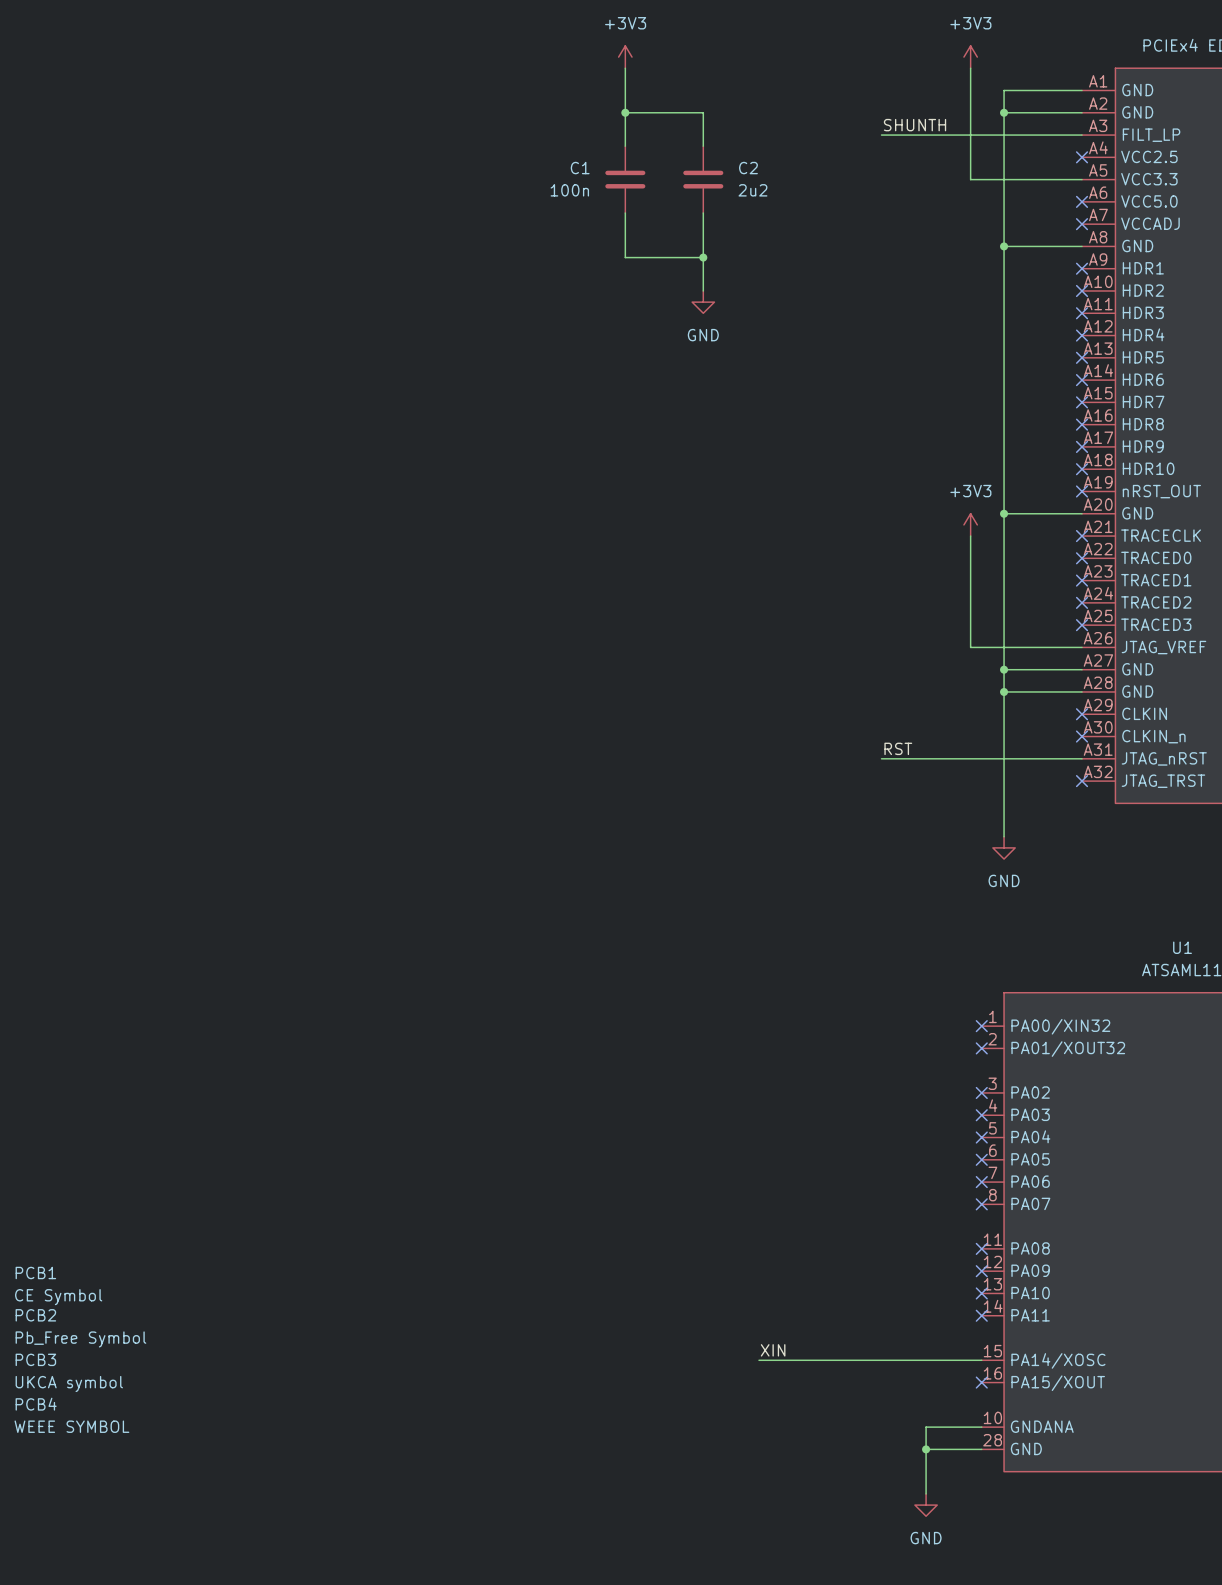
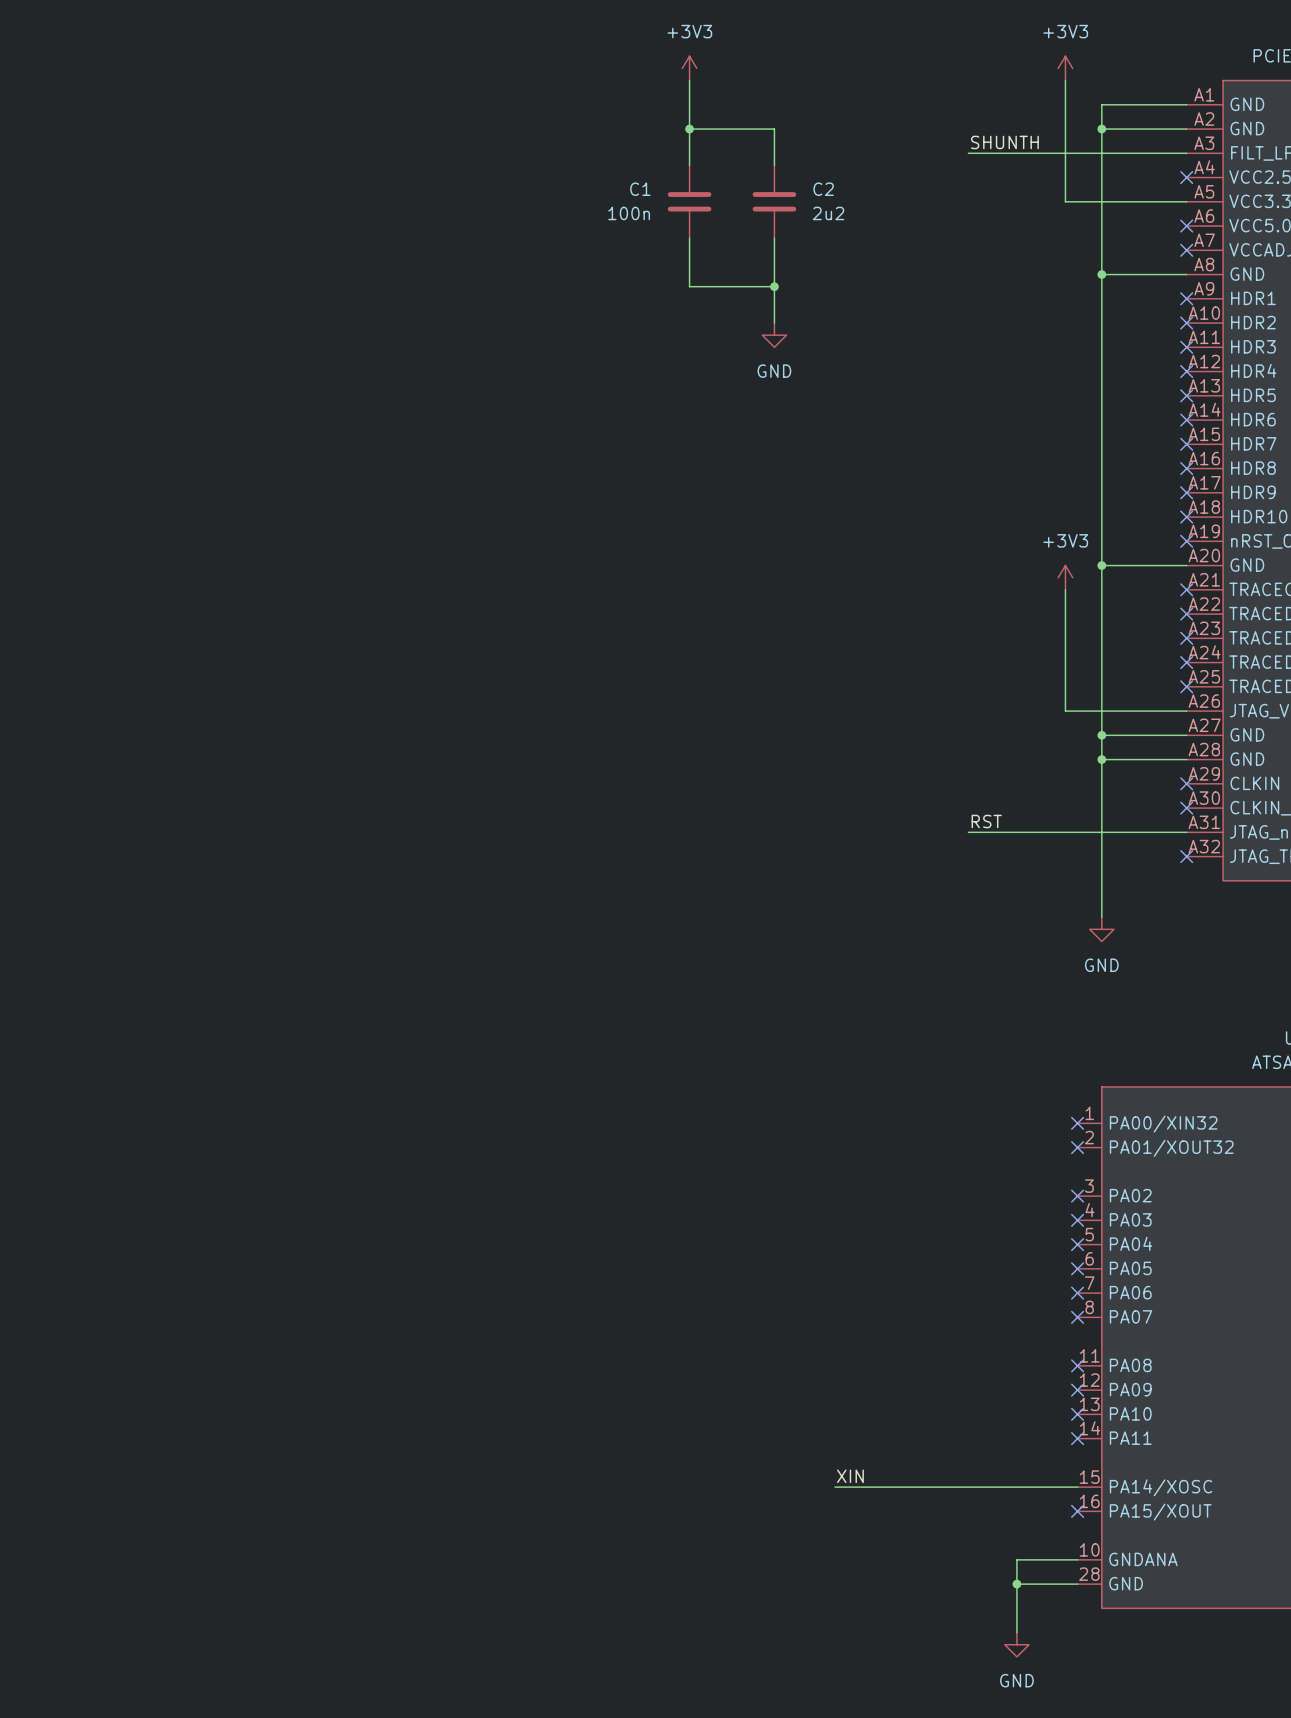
PCB1: CE Symbol (58, 1285) -> none
PCB2: Pb_Free Symbol (80, 1328) -> none
PCB3: UKCA symbol (69, 1372) -> none
PCB4: WEEE SYMBOL (71, 1415) -> none

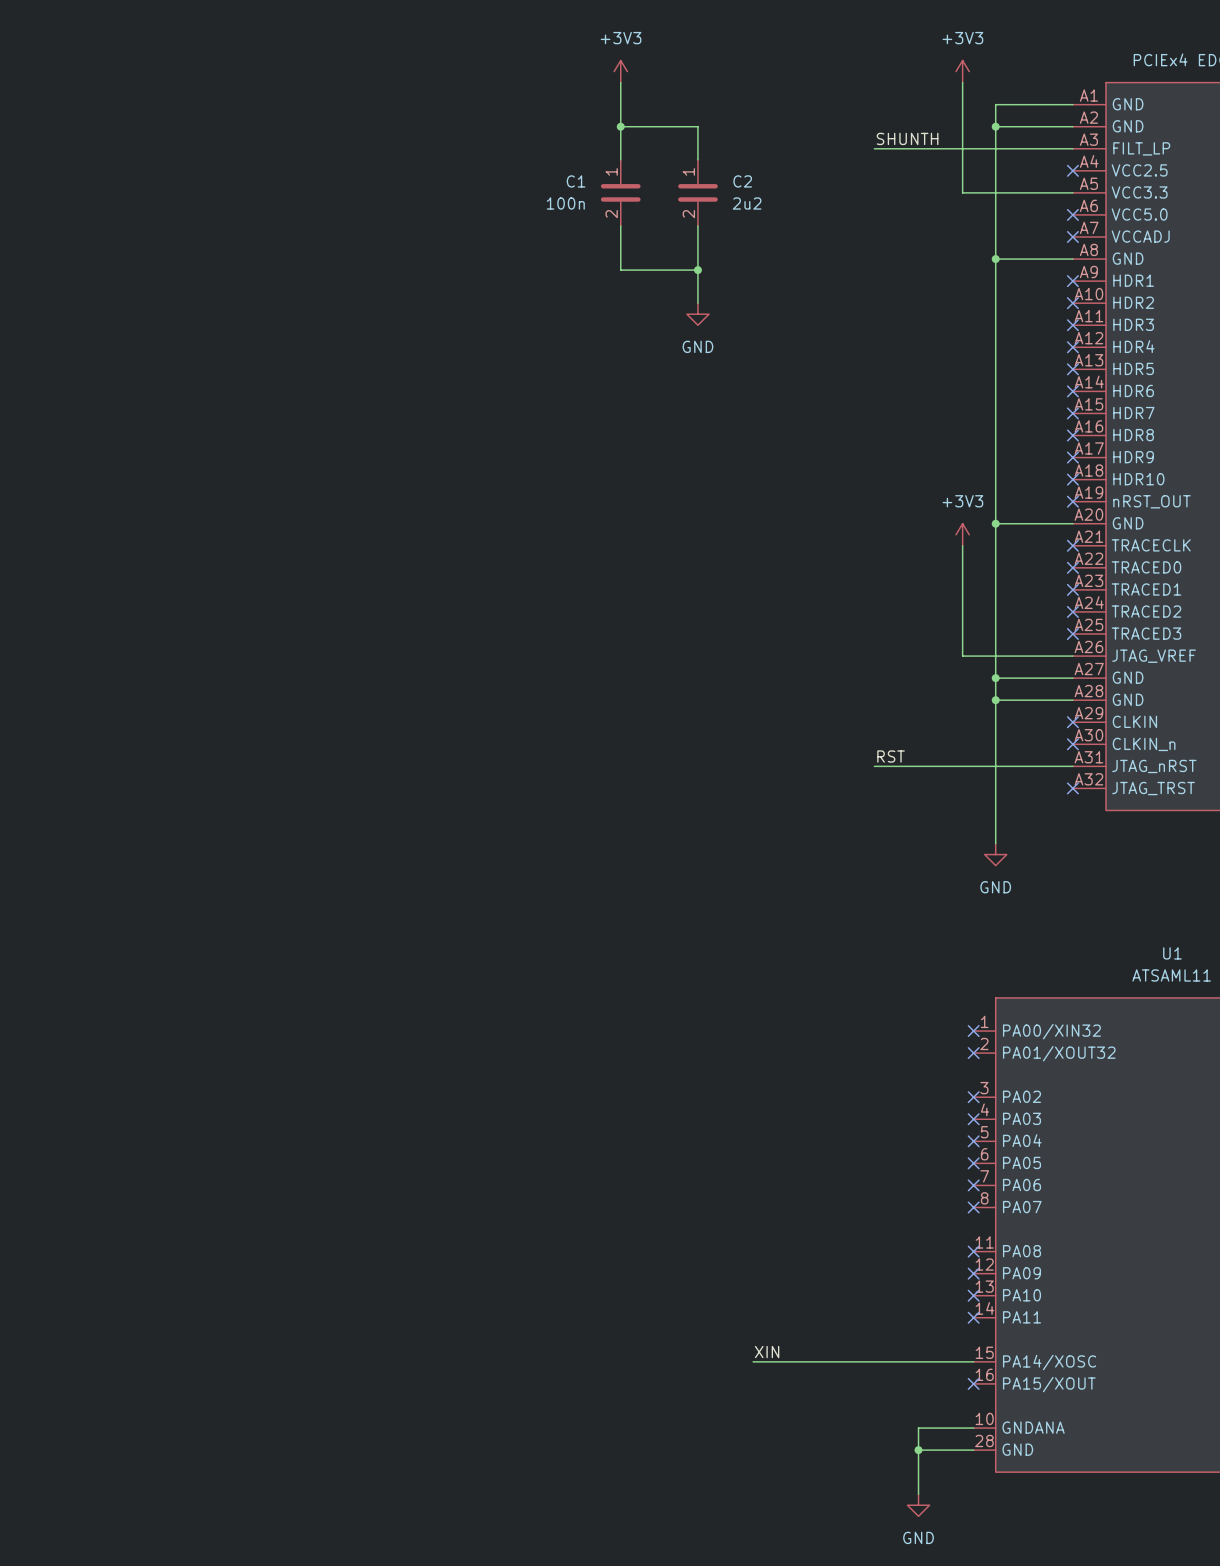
C1 pin number: none -> 1 (611, 171)
C2 pin number: none -> 1 (688, 171)
C1 pin number: none -> 2 (611, 214)
C2 pin number: none -> 2 (688, 214)

